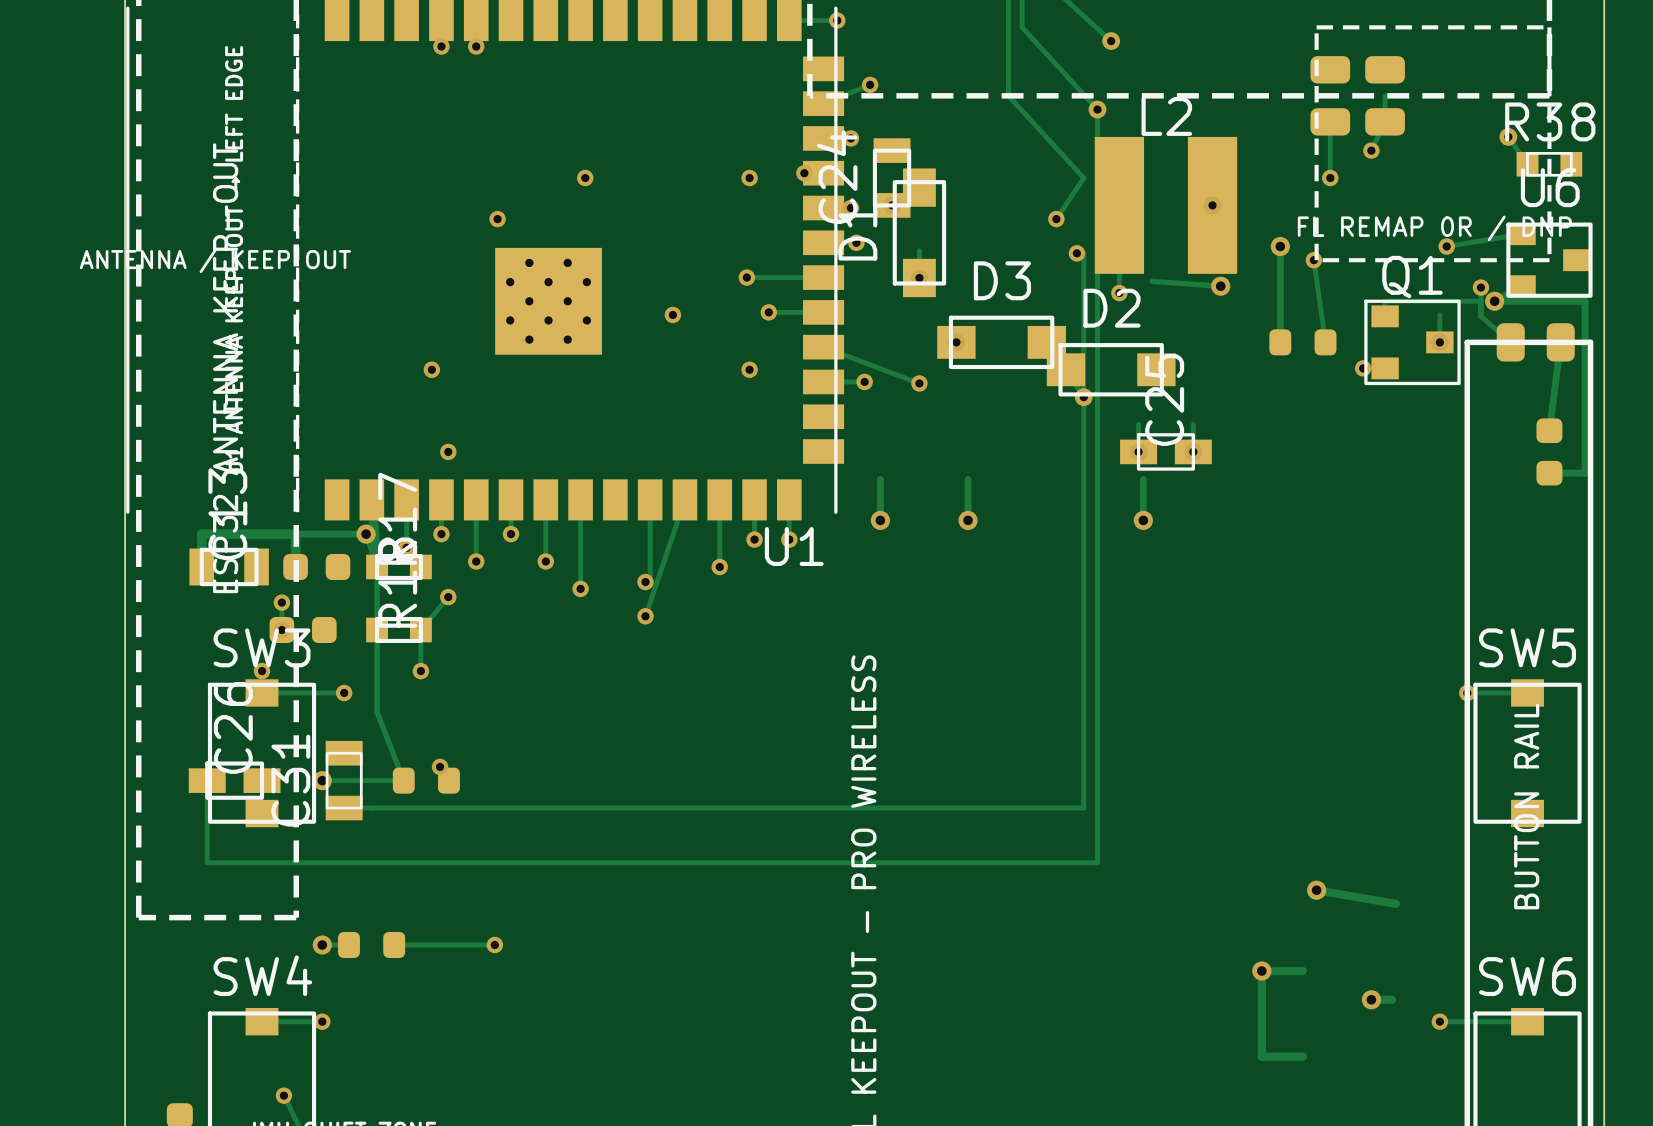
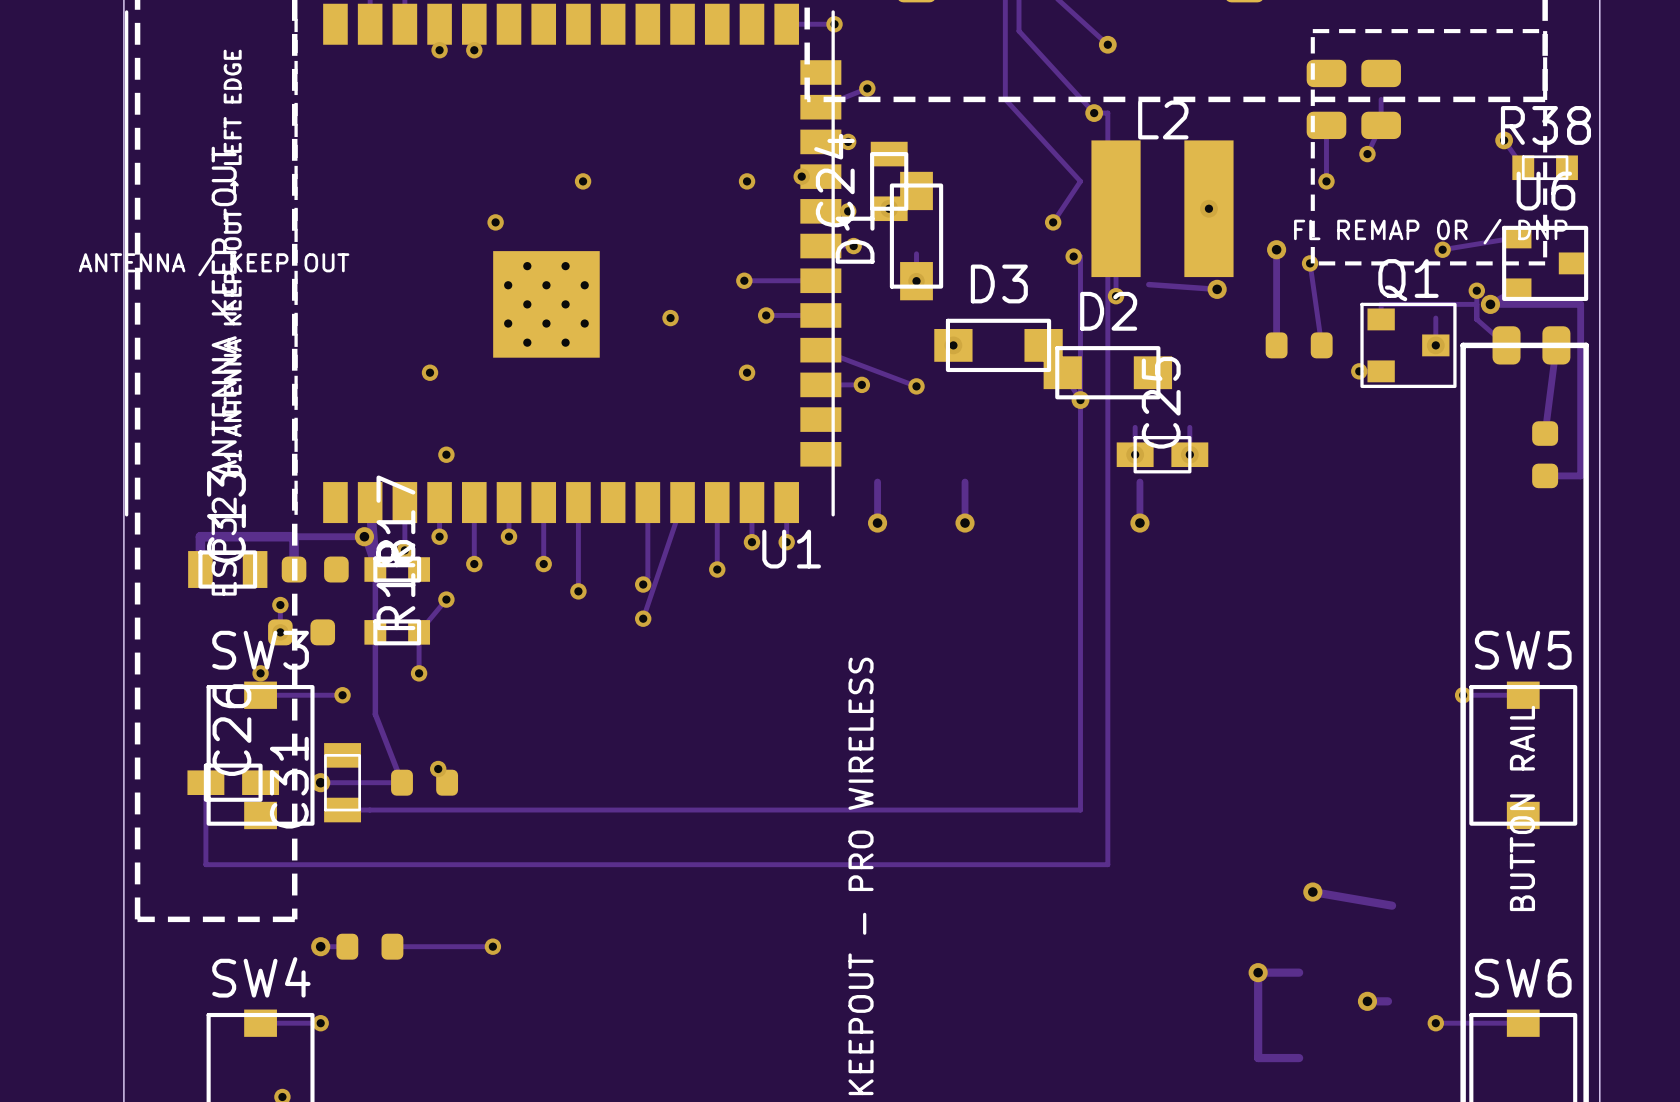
track: (1097, 109) (1097, 862) -> (1094, 113) (1107, 113) (1107, 864) (1094, 864)

